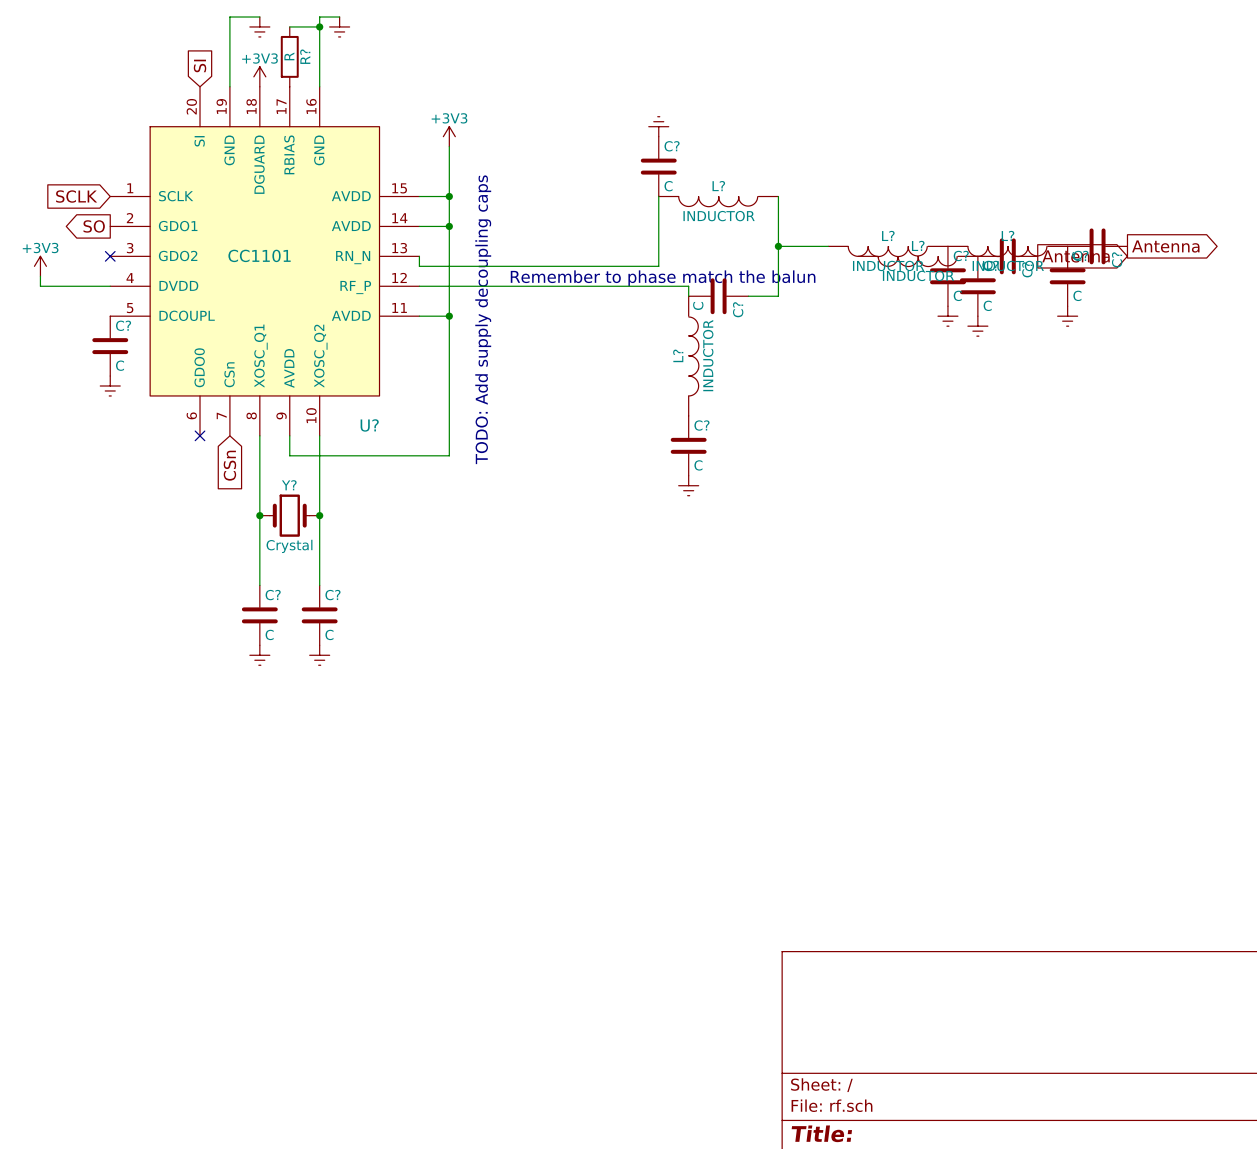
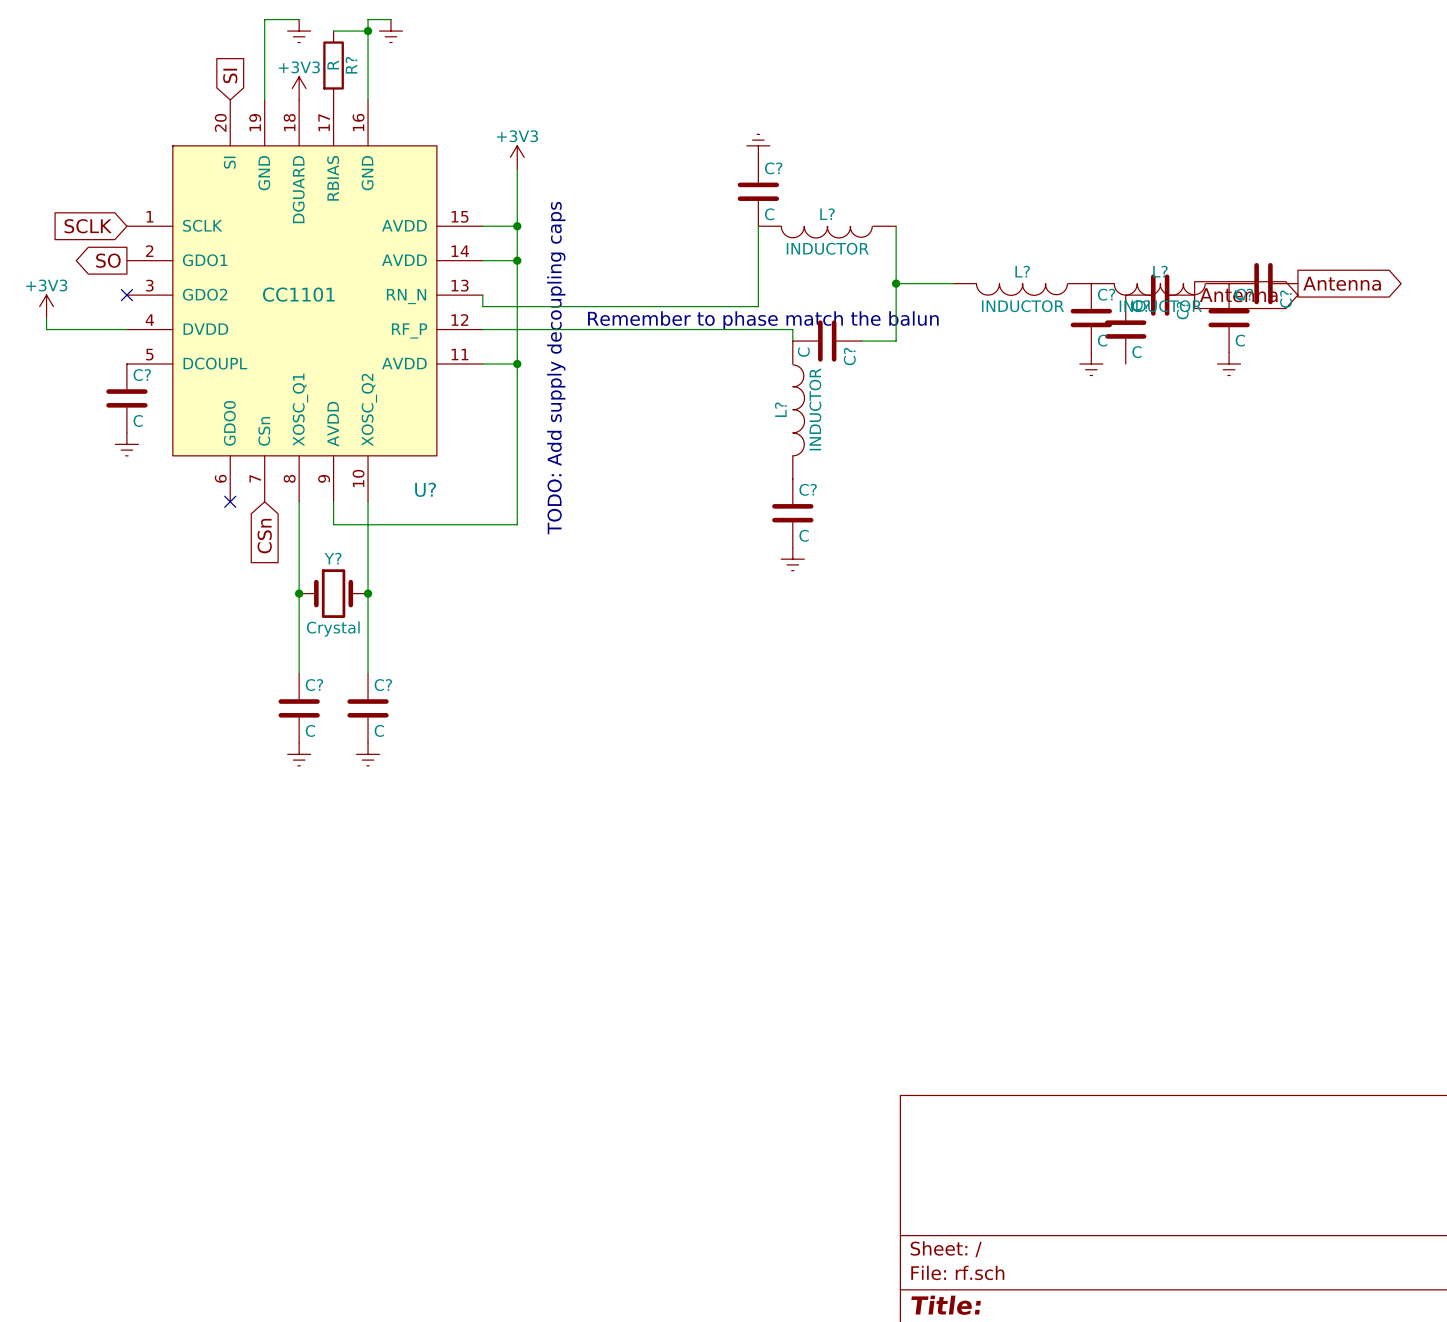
L?: INDUCTOR (918, 261) -> none
power symbol: (977, 326) -> none

